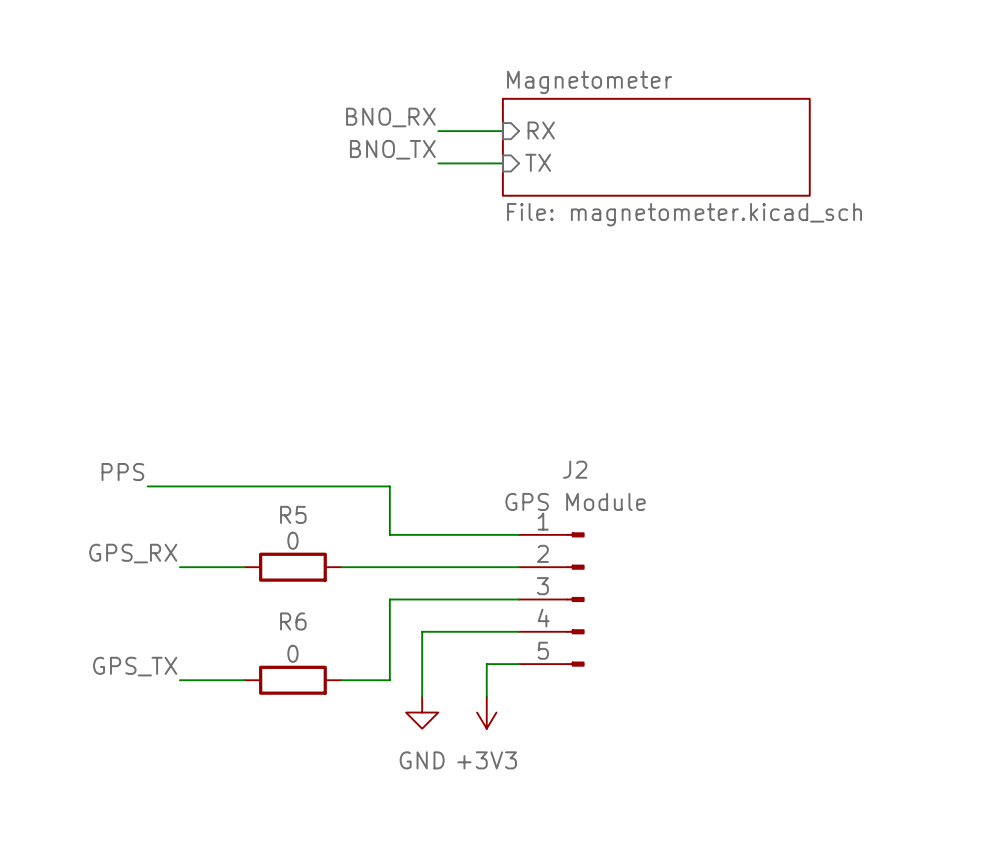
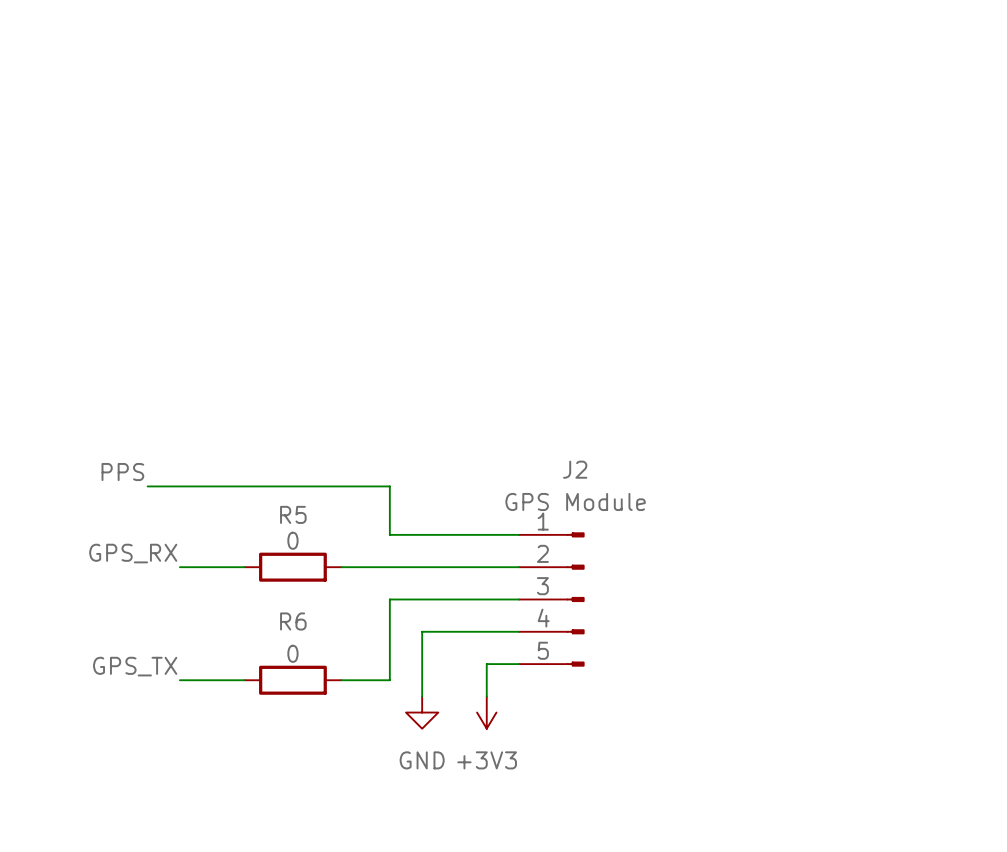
label: BNO_RX (390, 117) -> none
sheet pin: RX (541, 130) -> none
wire: (438, 131) (502, 131) -> none
sheet Magnetometer: File: magnetometer.kicad_sch (656, 147) -> none
label: BNO_TX (392, 149) -> none
sheet pin: TX (538, 162) -> none
wire: (438, 163) (502, 163) -> none

